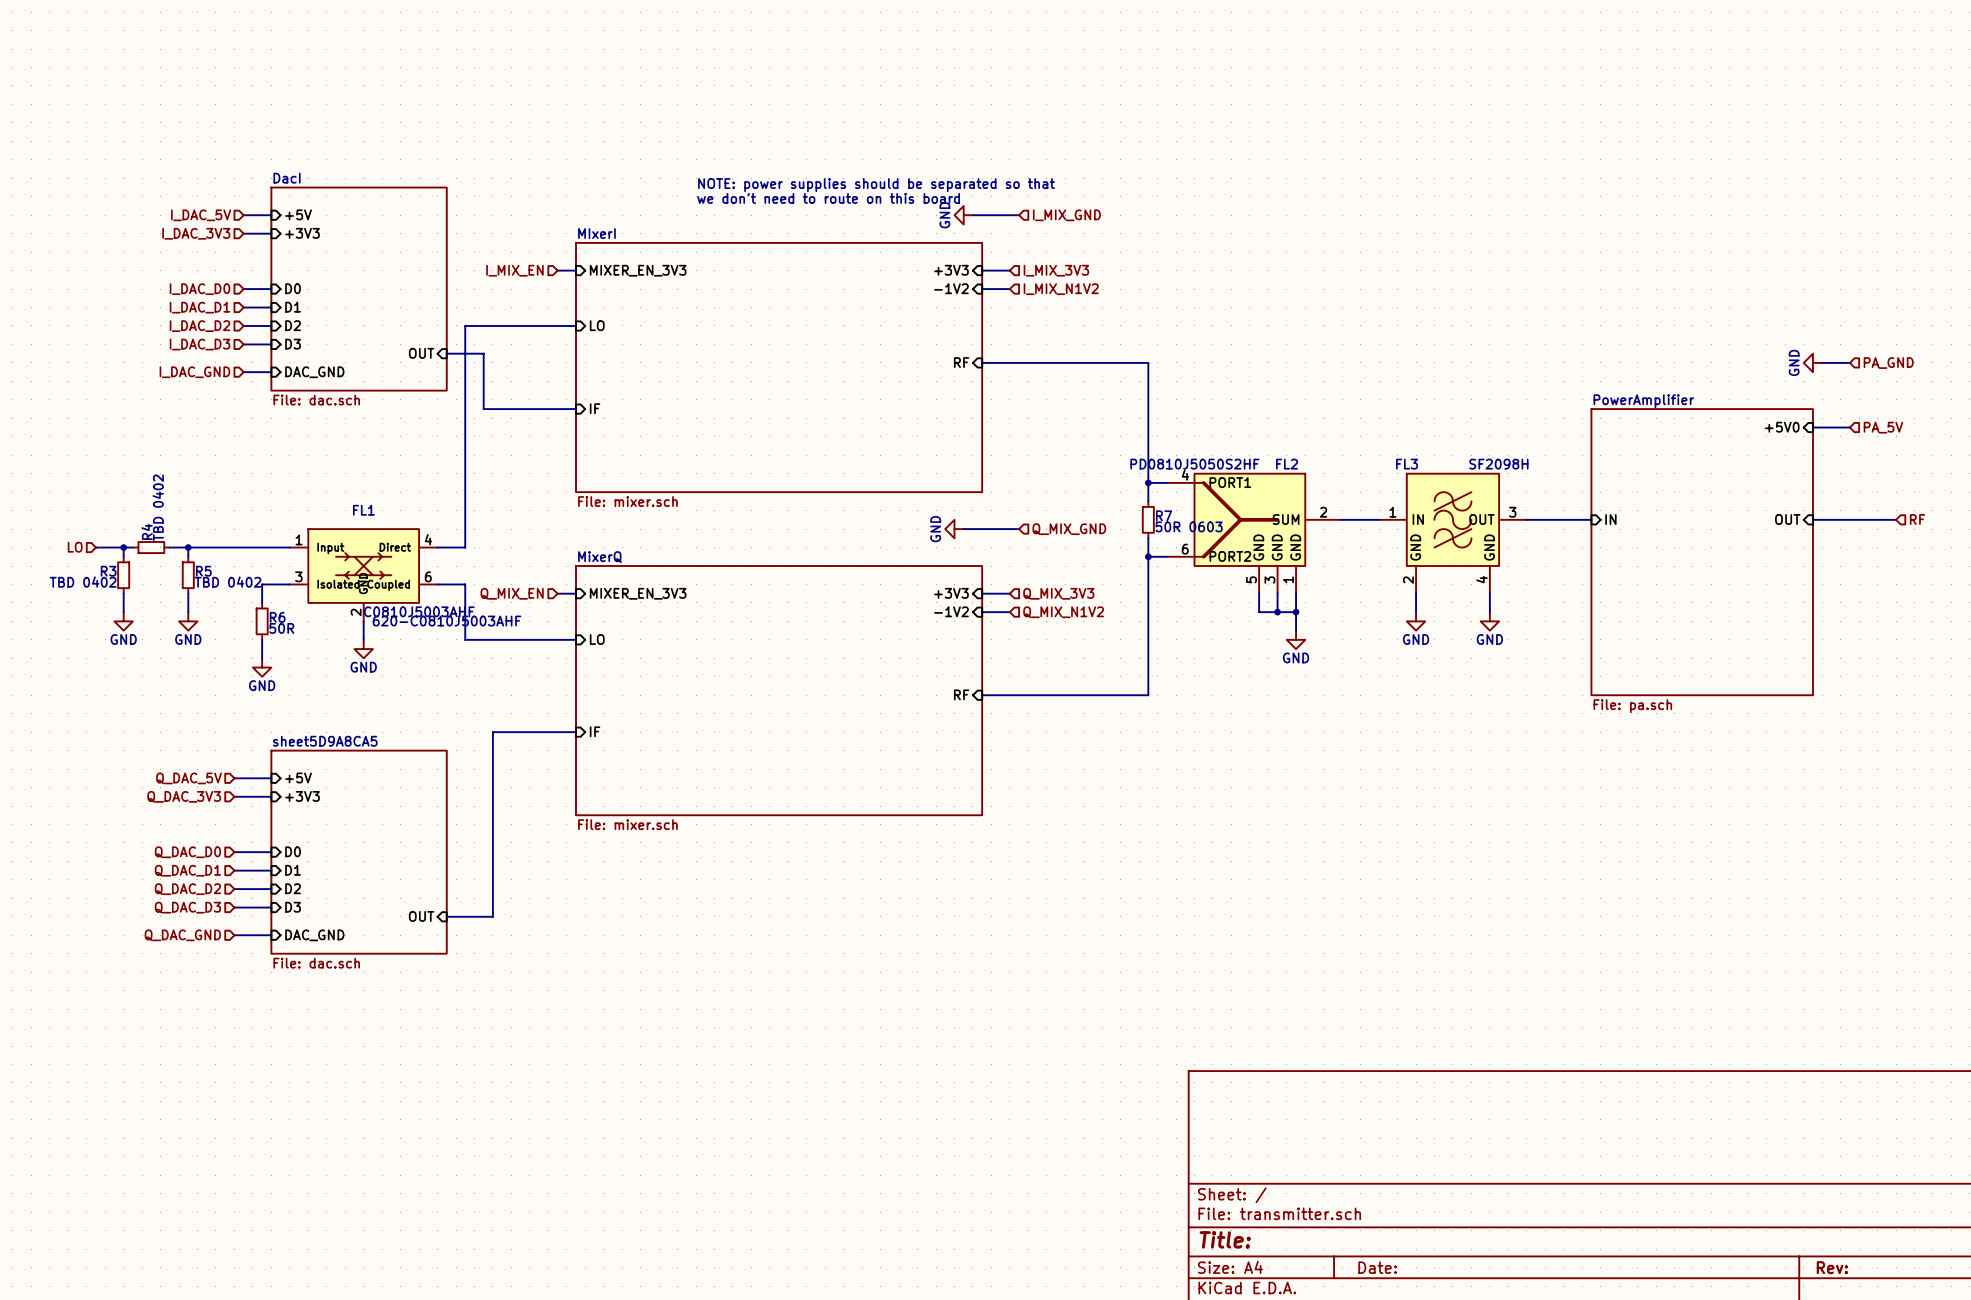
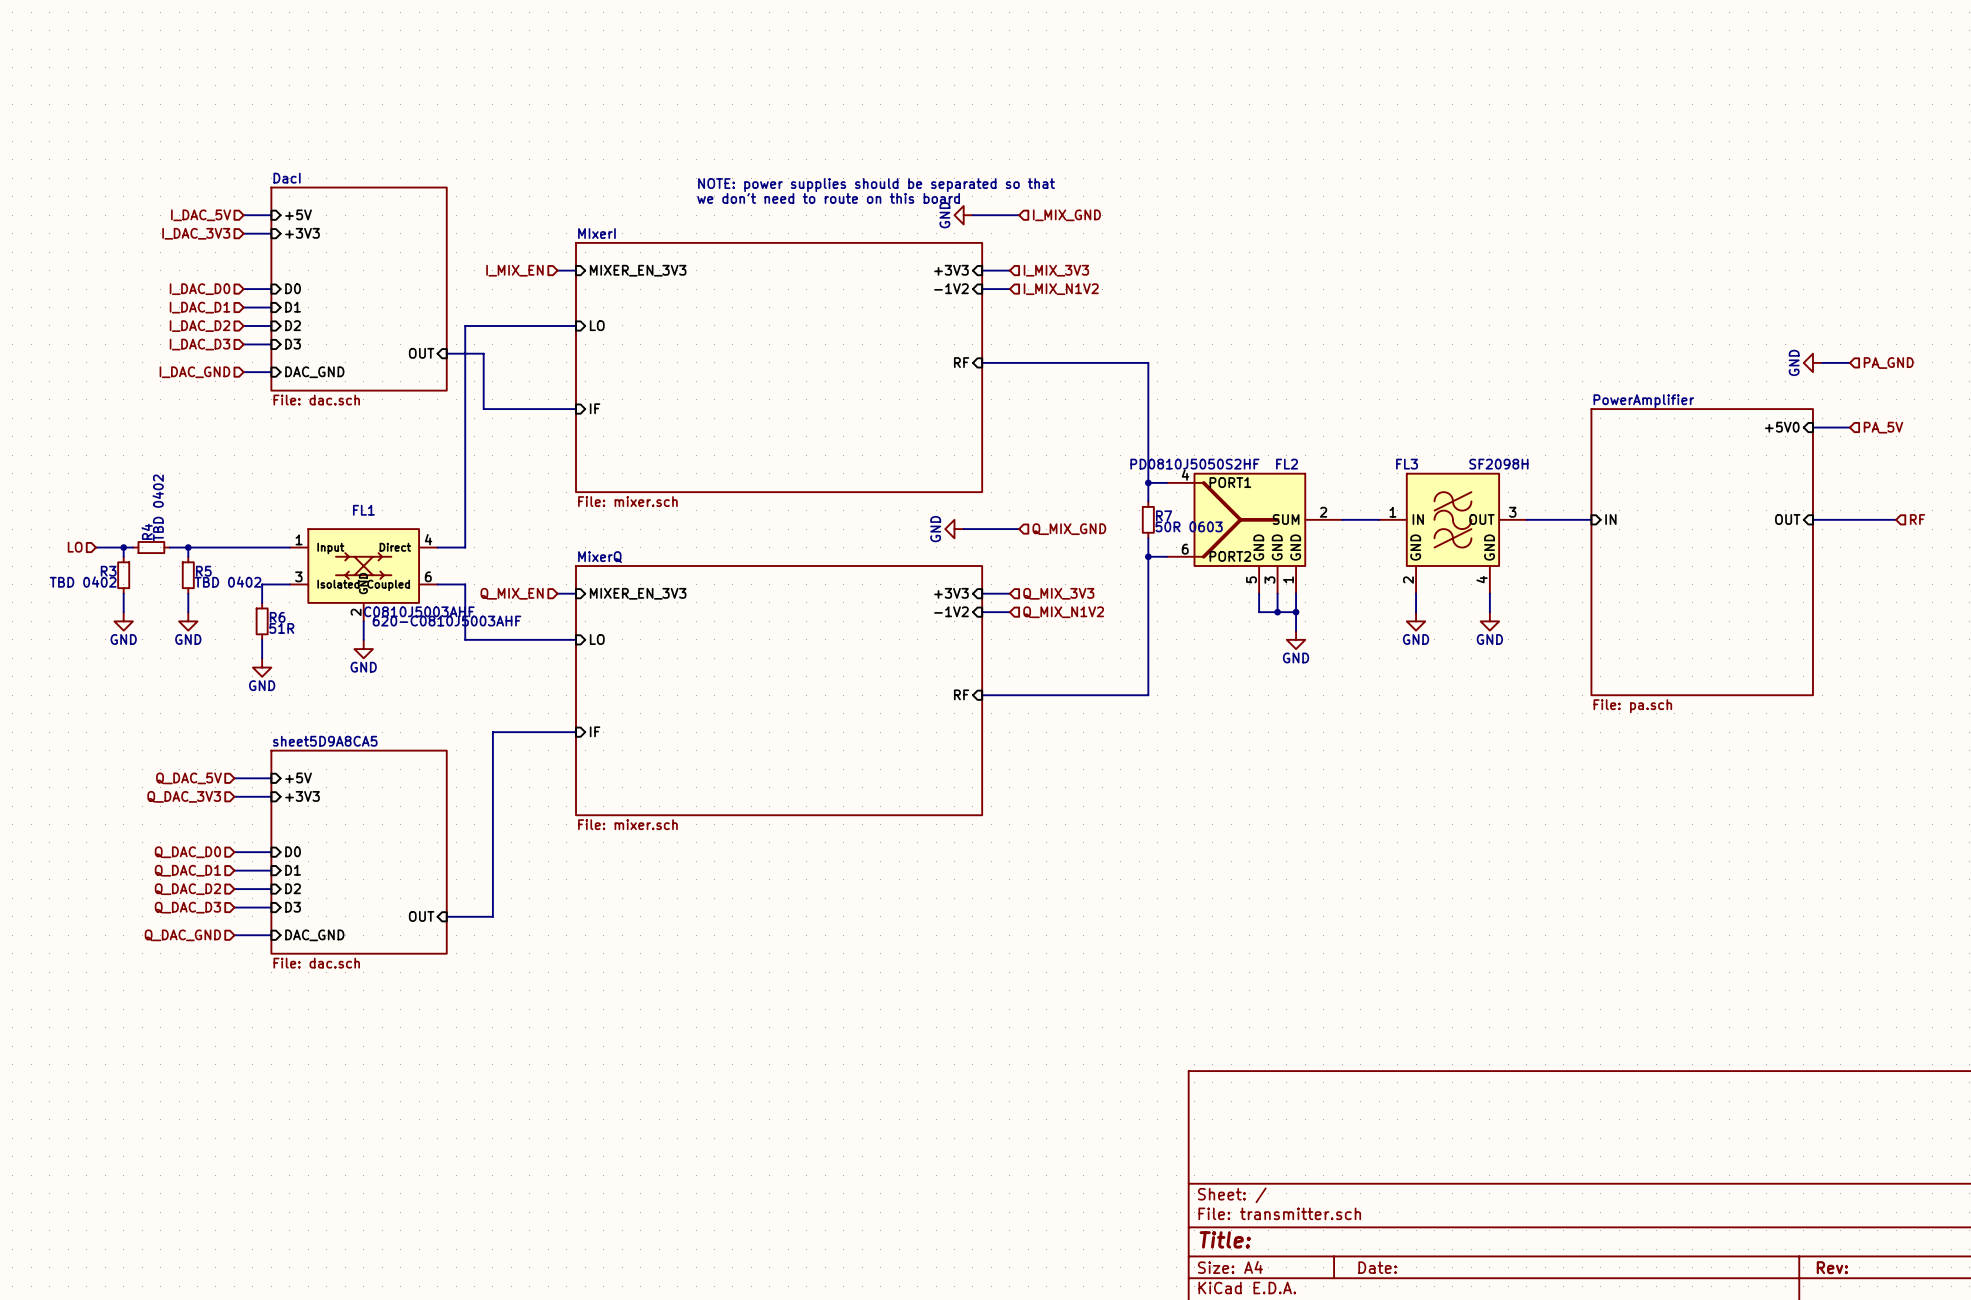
R6 value: 50R (281, 628) -> 51R (281, 628)

